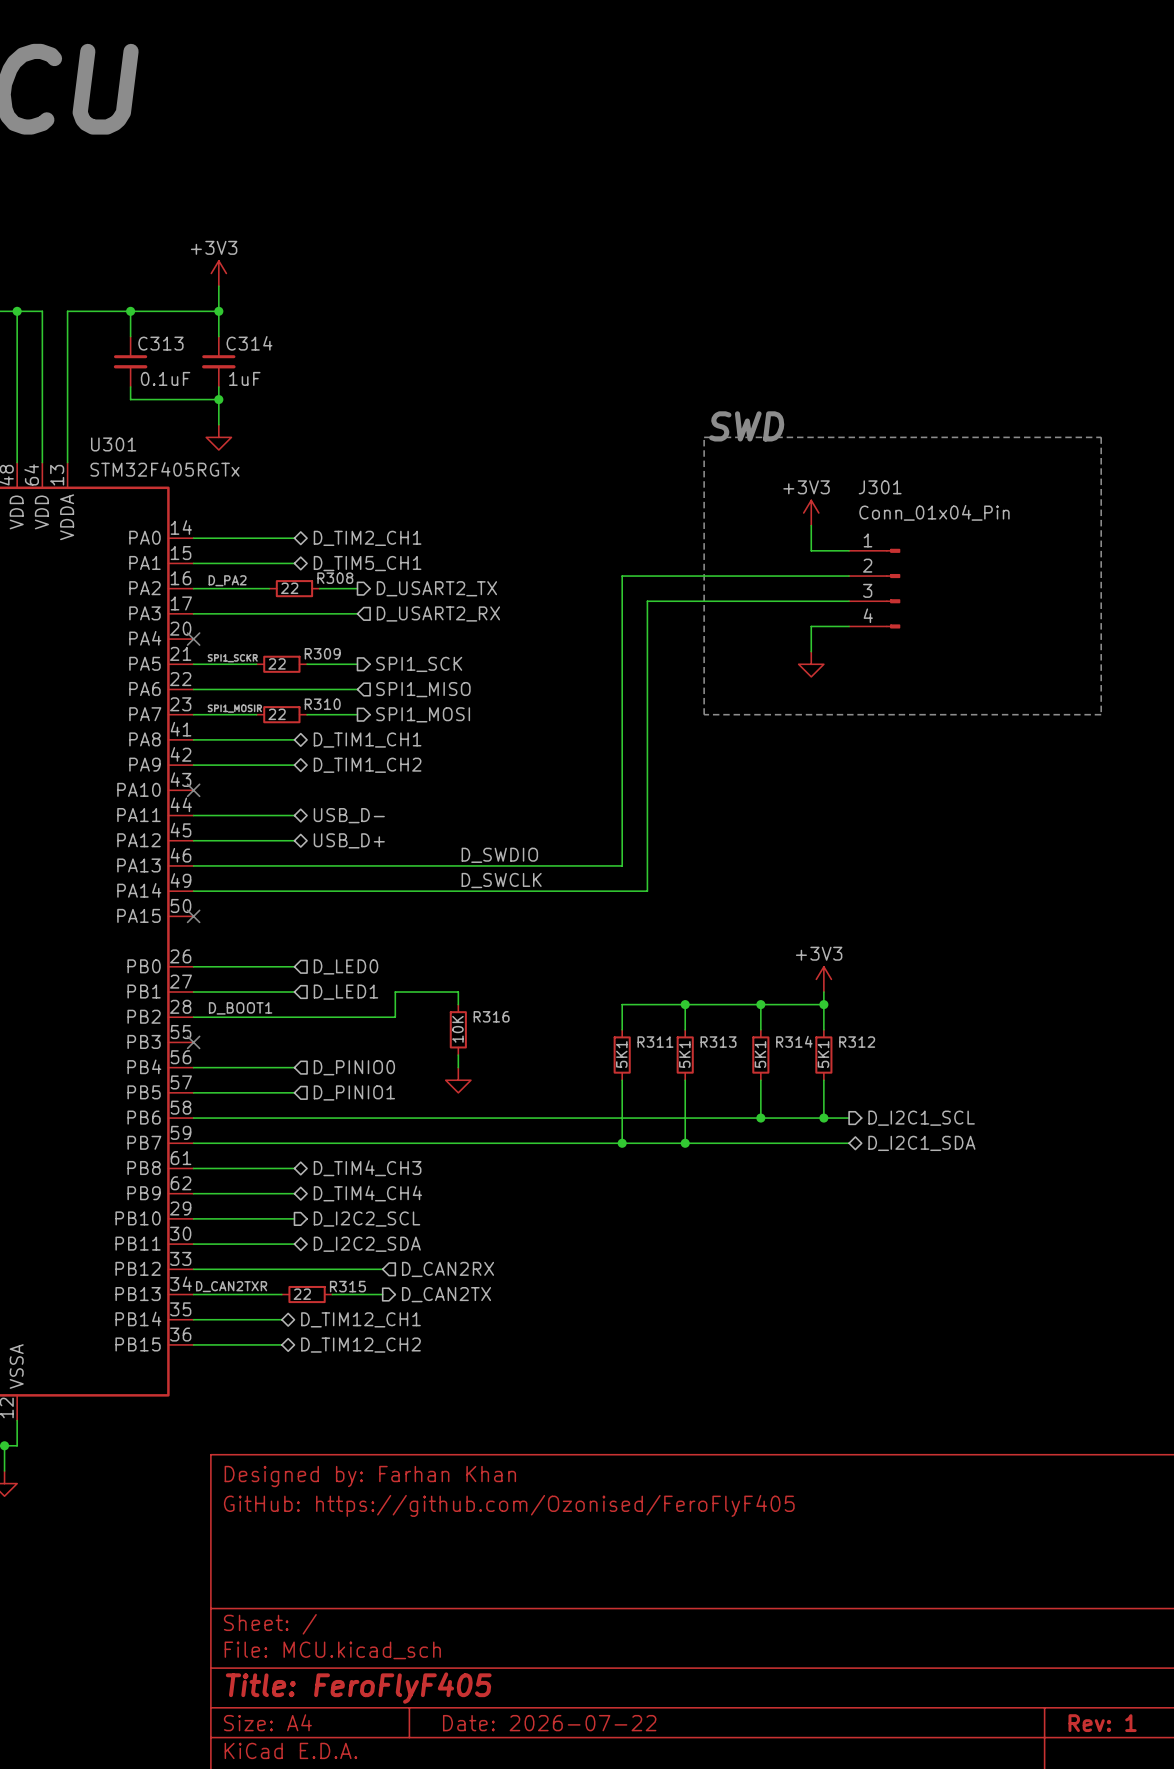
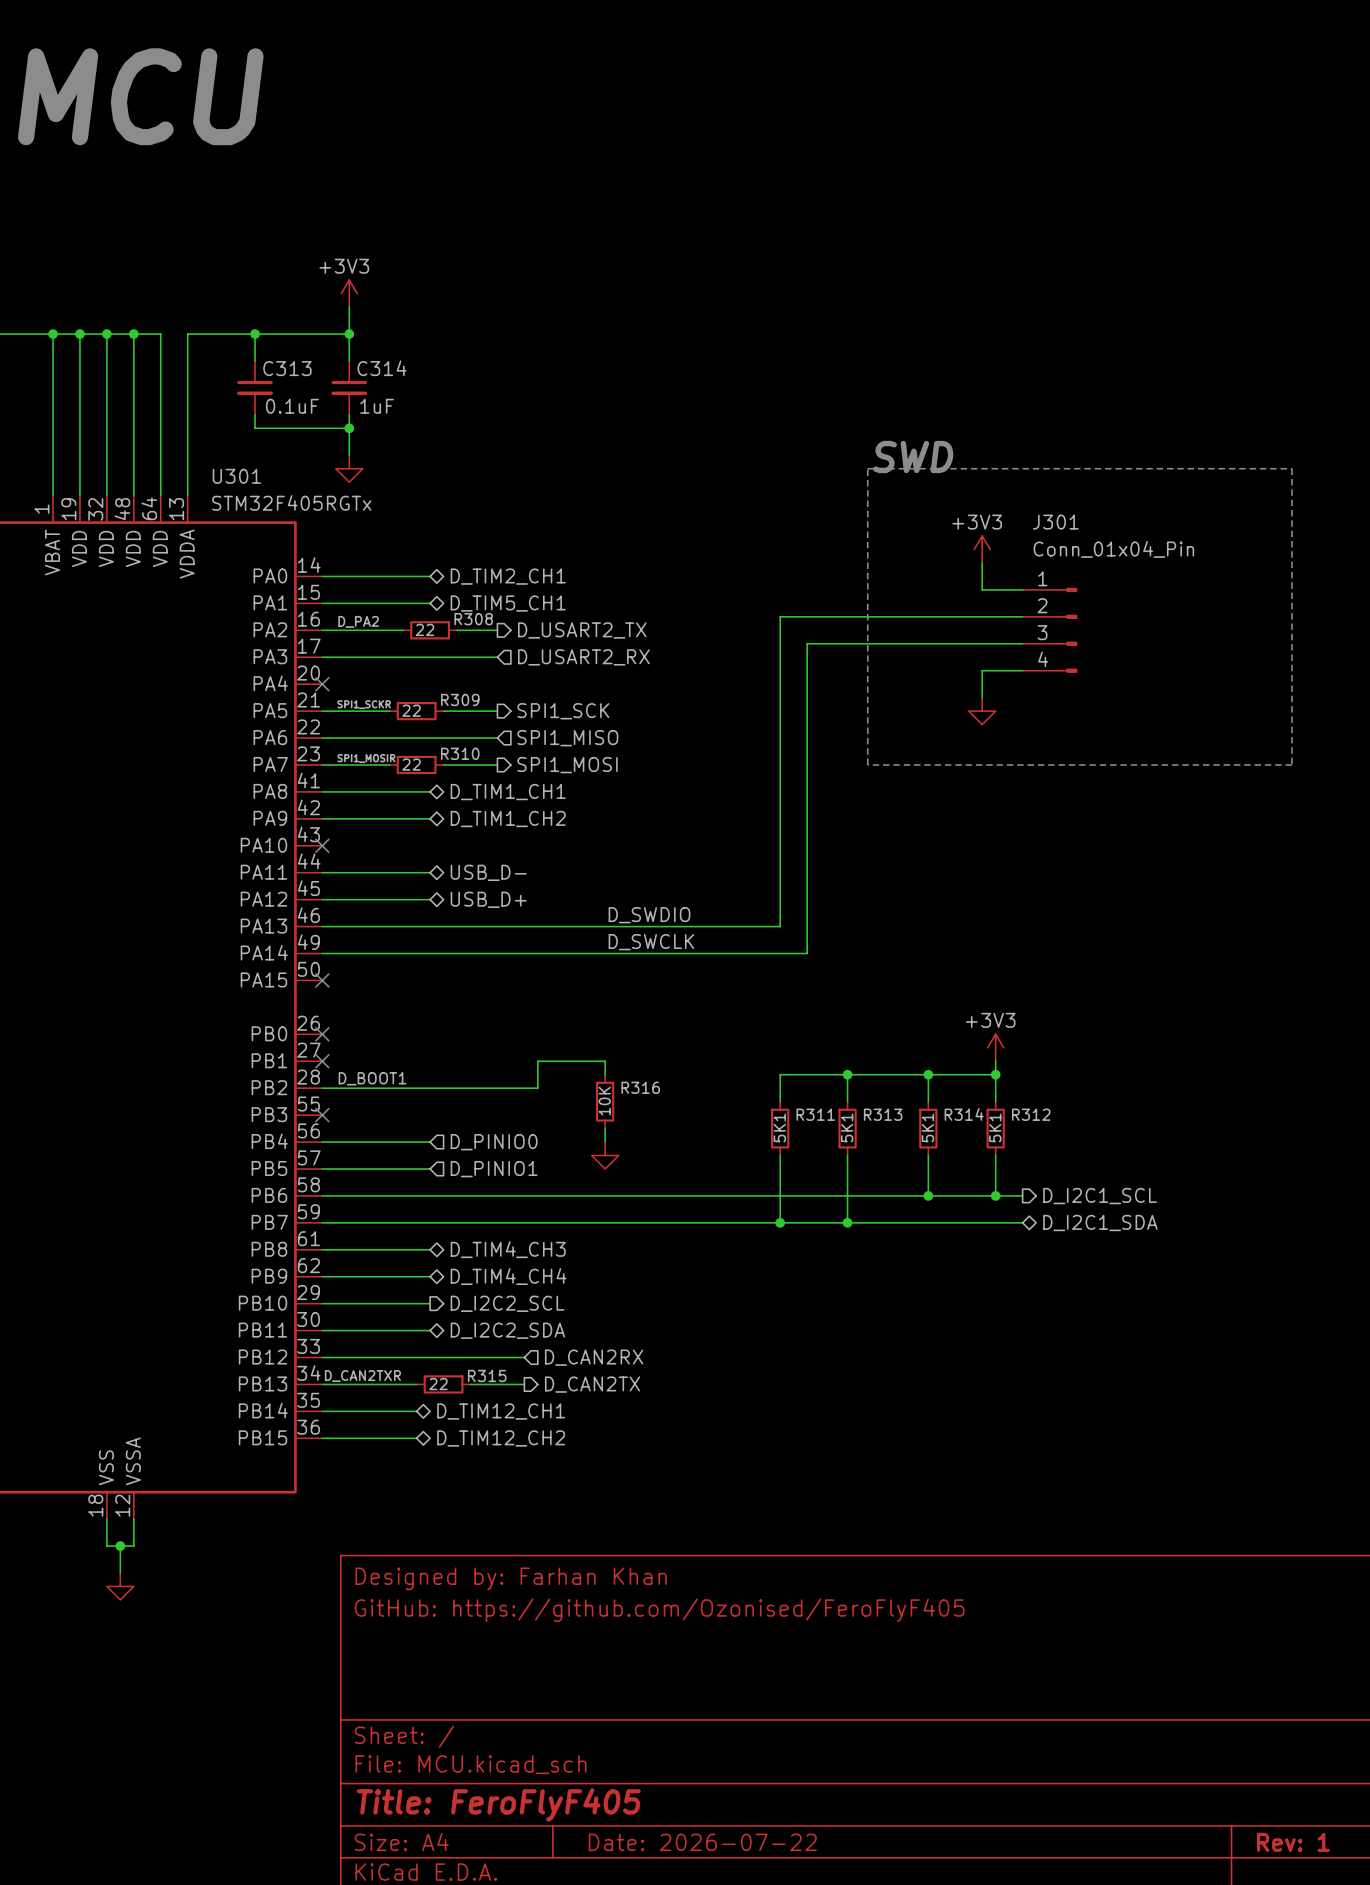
wire: (193, 966) (294, 966) -> none
no-connect mark: none -> (322, 1034)
hierarchical label: D_LED0 (345, 966) -> none
wire: (193, 992) (294, 992) -> none
no-connect mark: none -> (322, 1061)
hierarchical label: D_LED1 (345, 992) -> none

